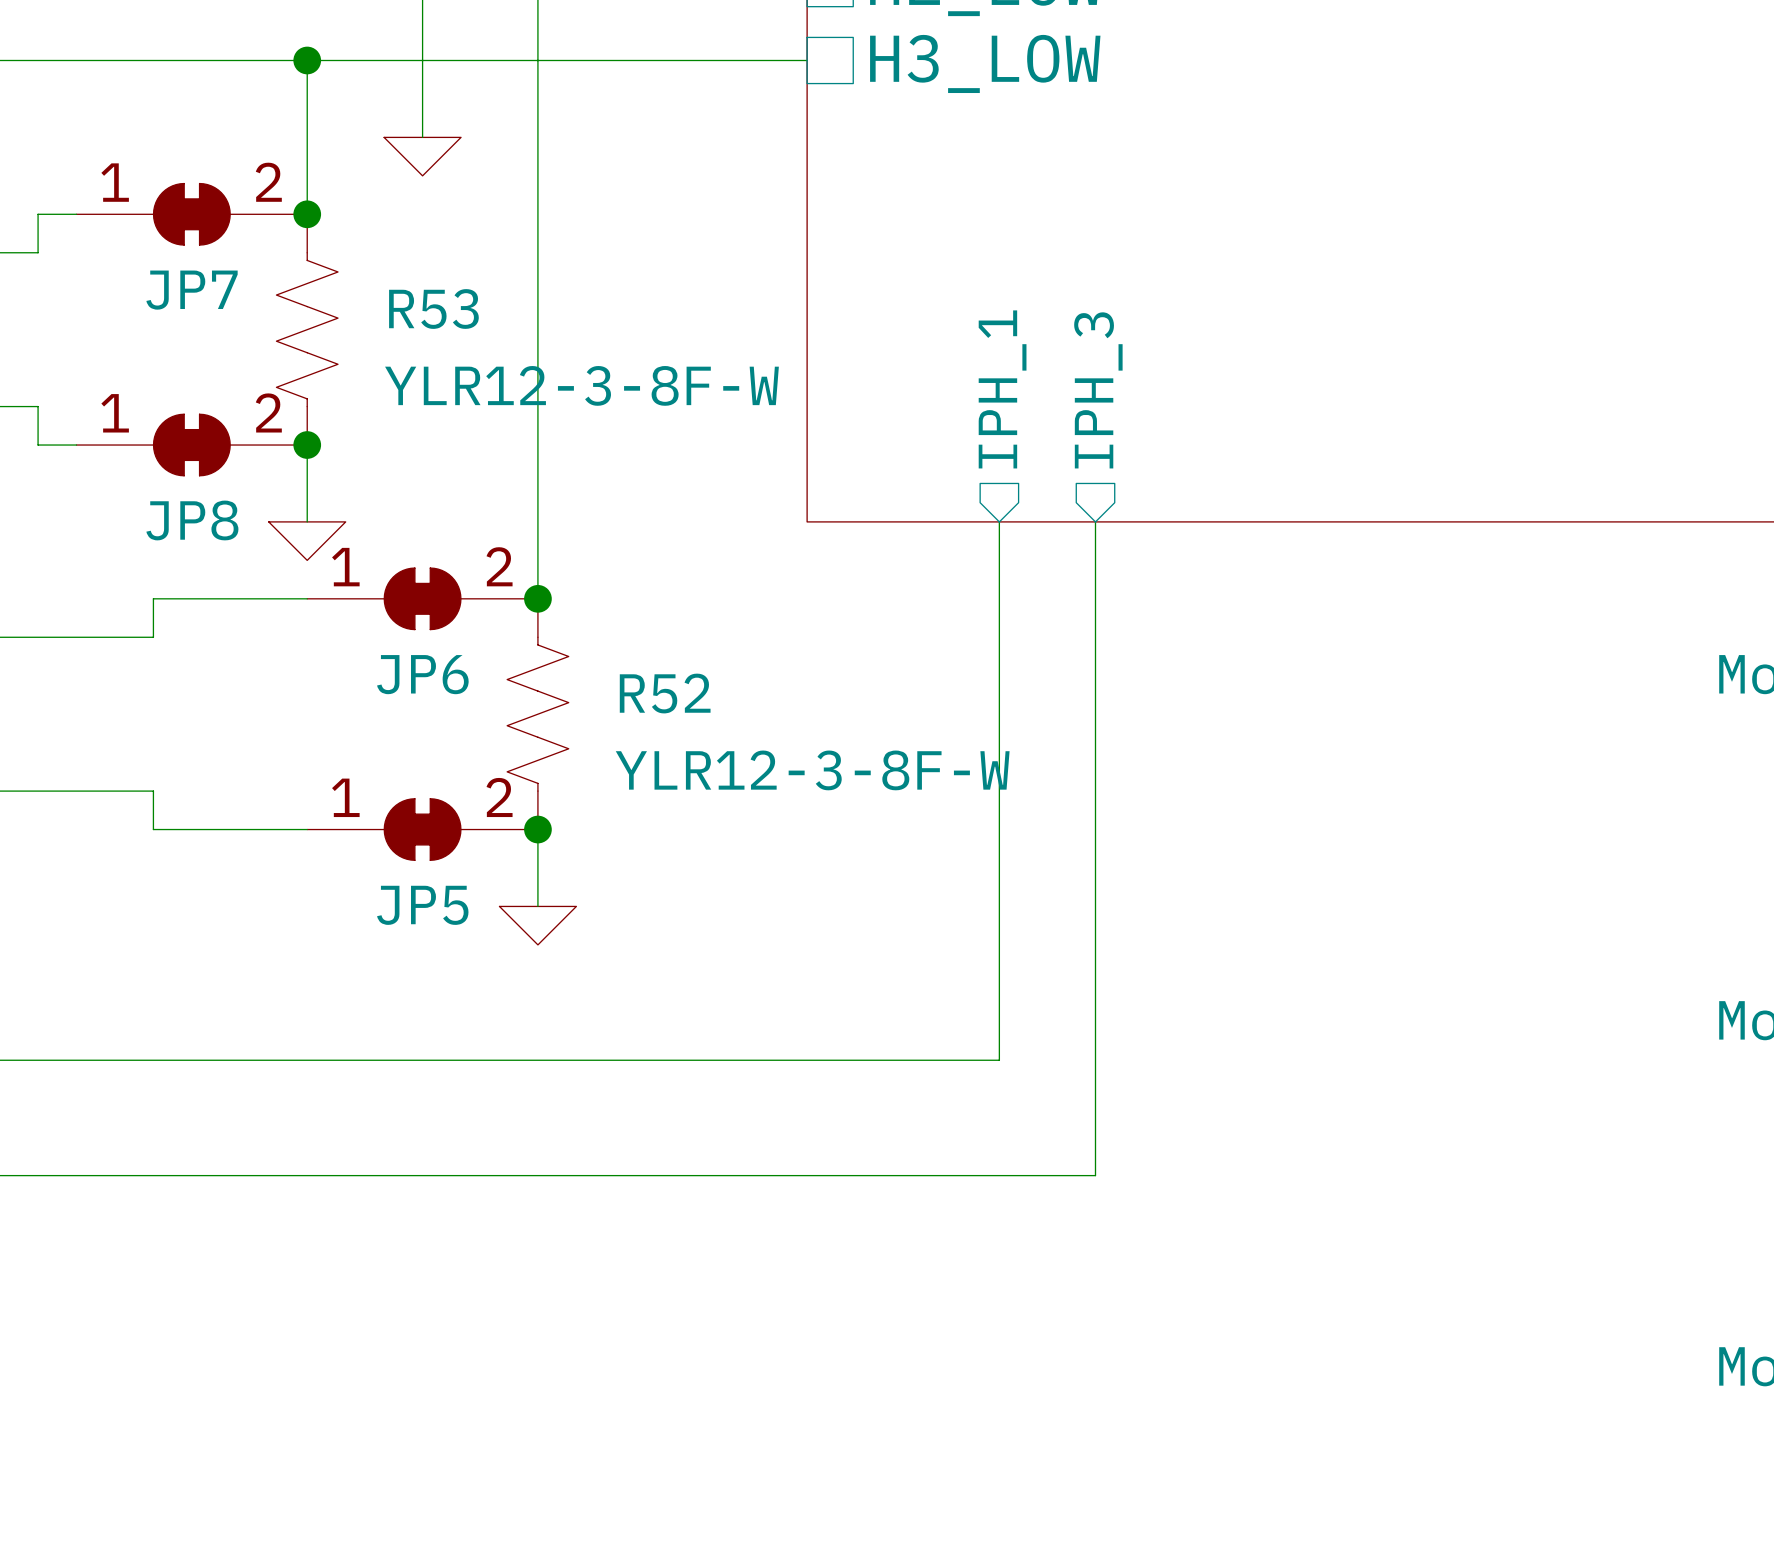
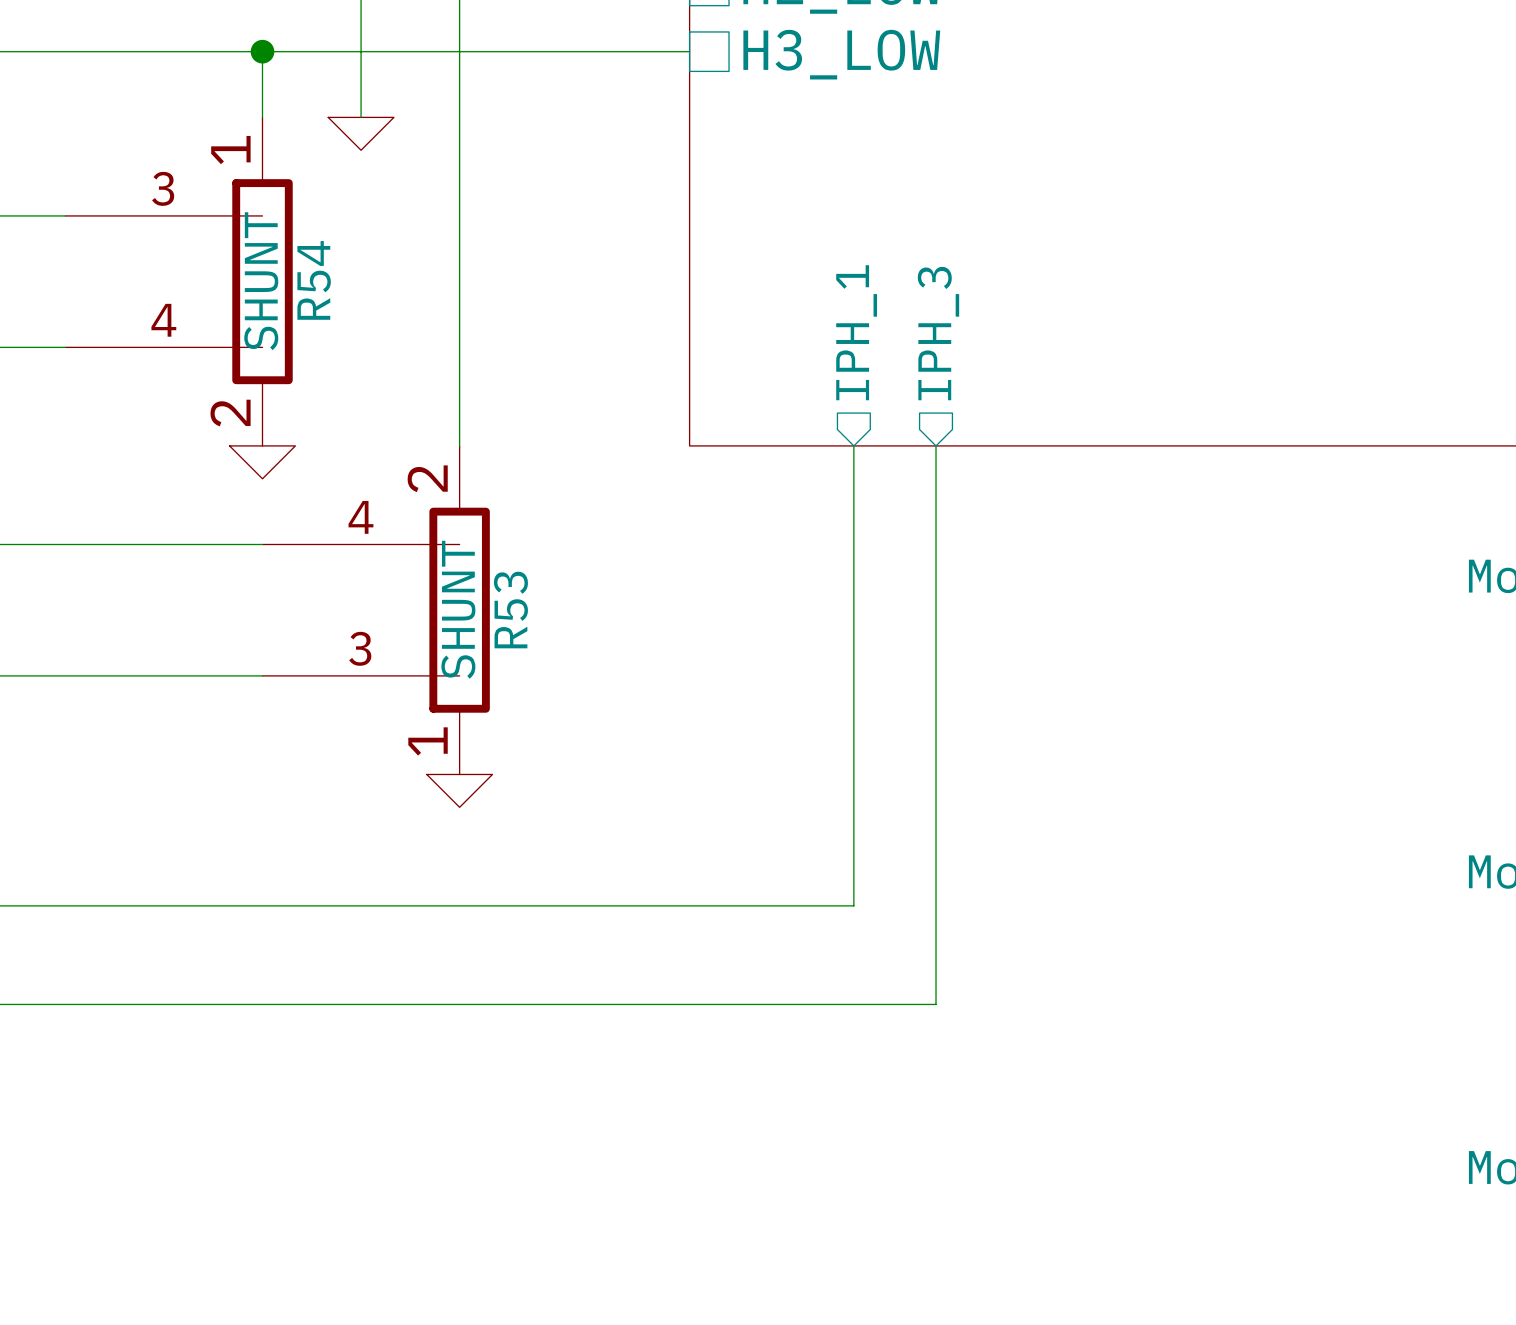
wire: (76, 214) (38, 214) (38, 252) -> (65, 215) (32, 215)
JP7: (191, 214) -> none
R53 symbol: [276, 214, 338, 446] -> [262, 445, 490, 775]
junction: (307, 214) -> none
R54: none -> SHUNT (179, 281)
R53 value: YLR12-3-8F-W (581, 385) -> SHUNT (458, 609)
wire: (38, 406) (38, 445) (76, 445) -> (32, 347) (65, 347)
JP8: (191, 445) -> none
junction: (307, 445) -> none
wire: (307, 598) (153, 598) (153, 637) -> (262, 544) (131, 544)
JP6: (422, 598) -> none
junction: (537, 598) -> none
R52: YLR12-3-8F-W (537, 714) -> none
wire: (153, 791) (153, 829) (307, 829) -> (131, 675) (262, 675)
JP5: (422, 829) -> none
junction: (537, 829) -> none

